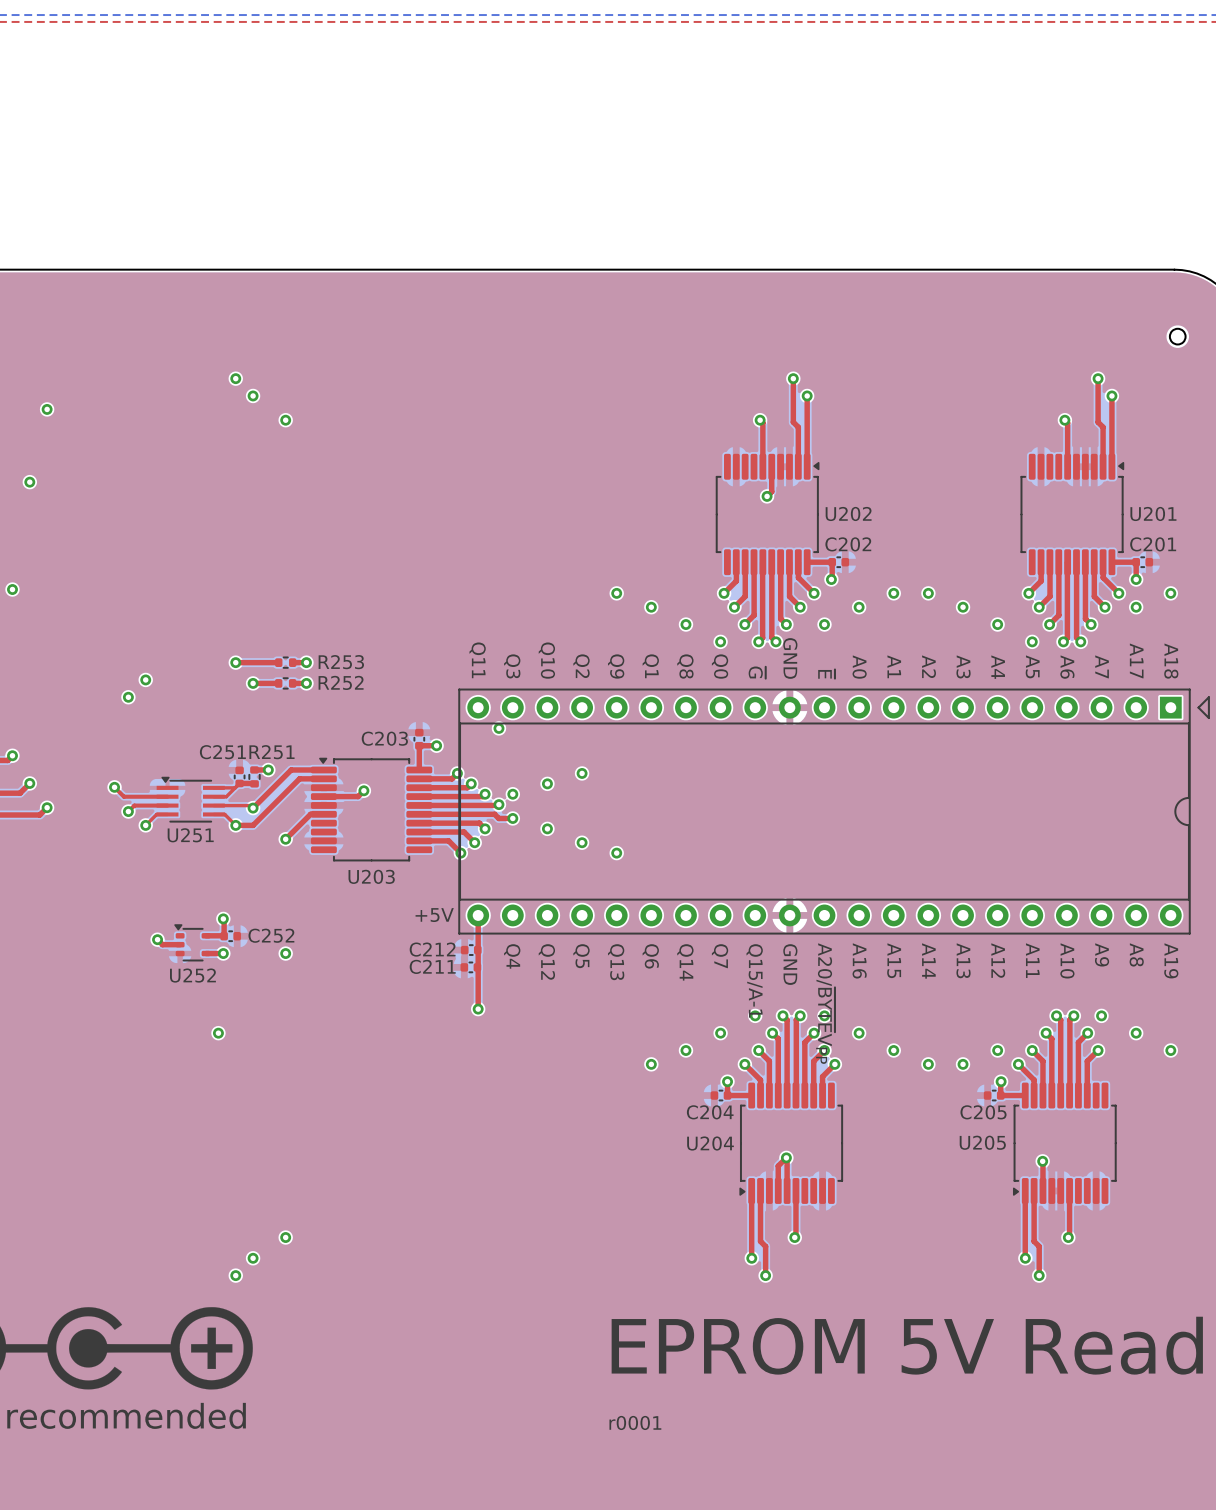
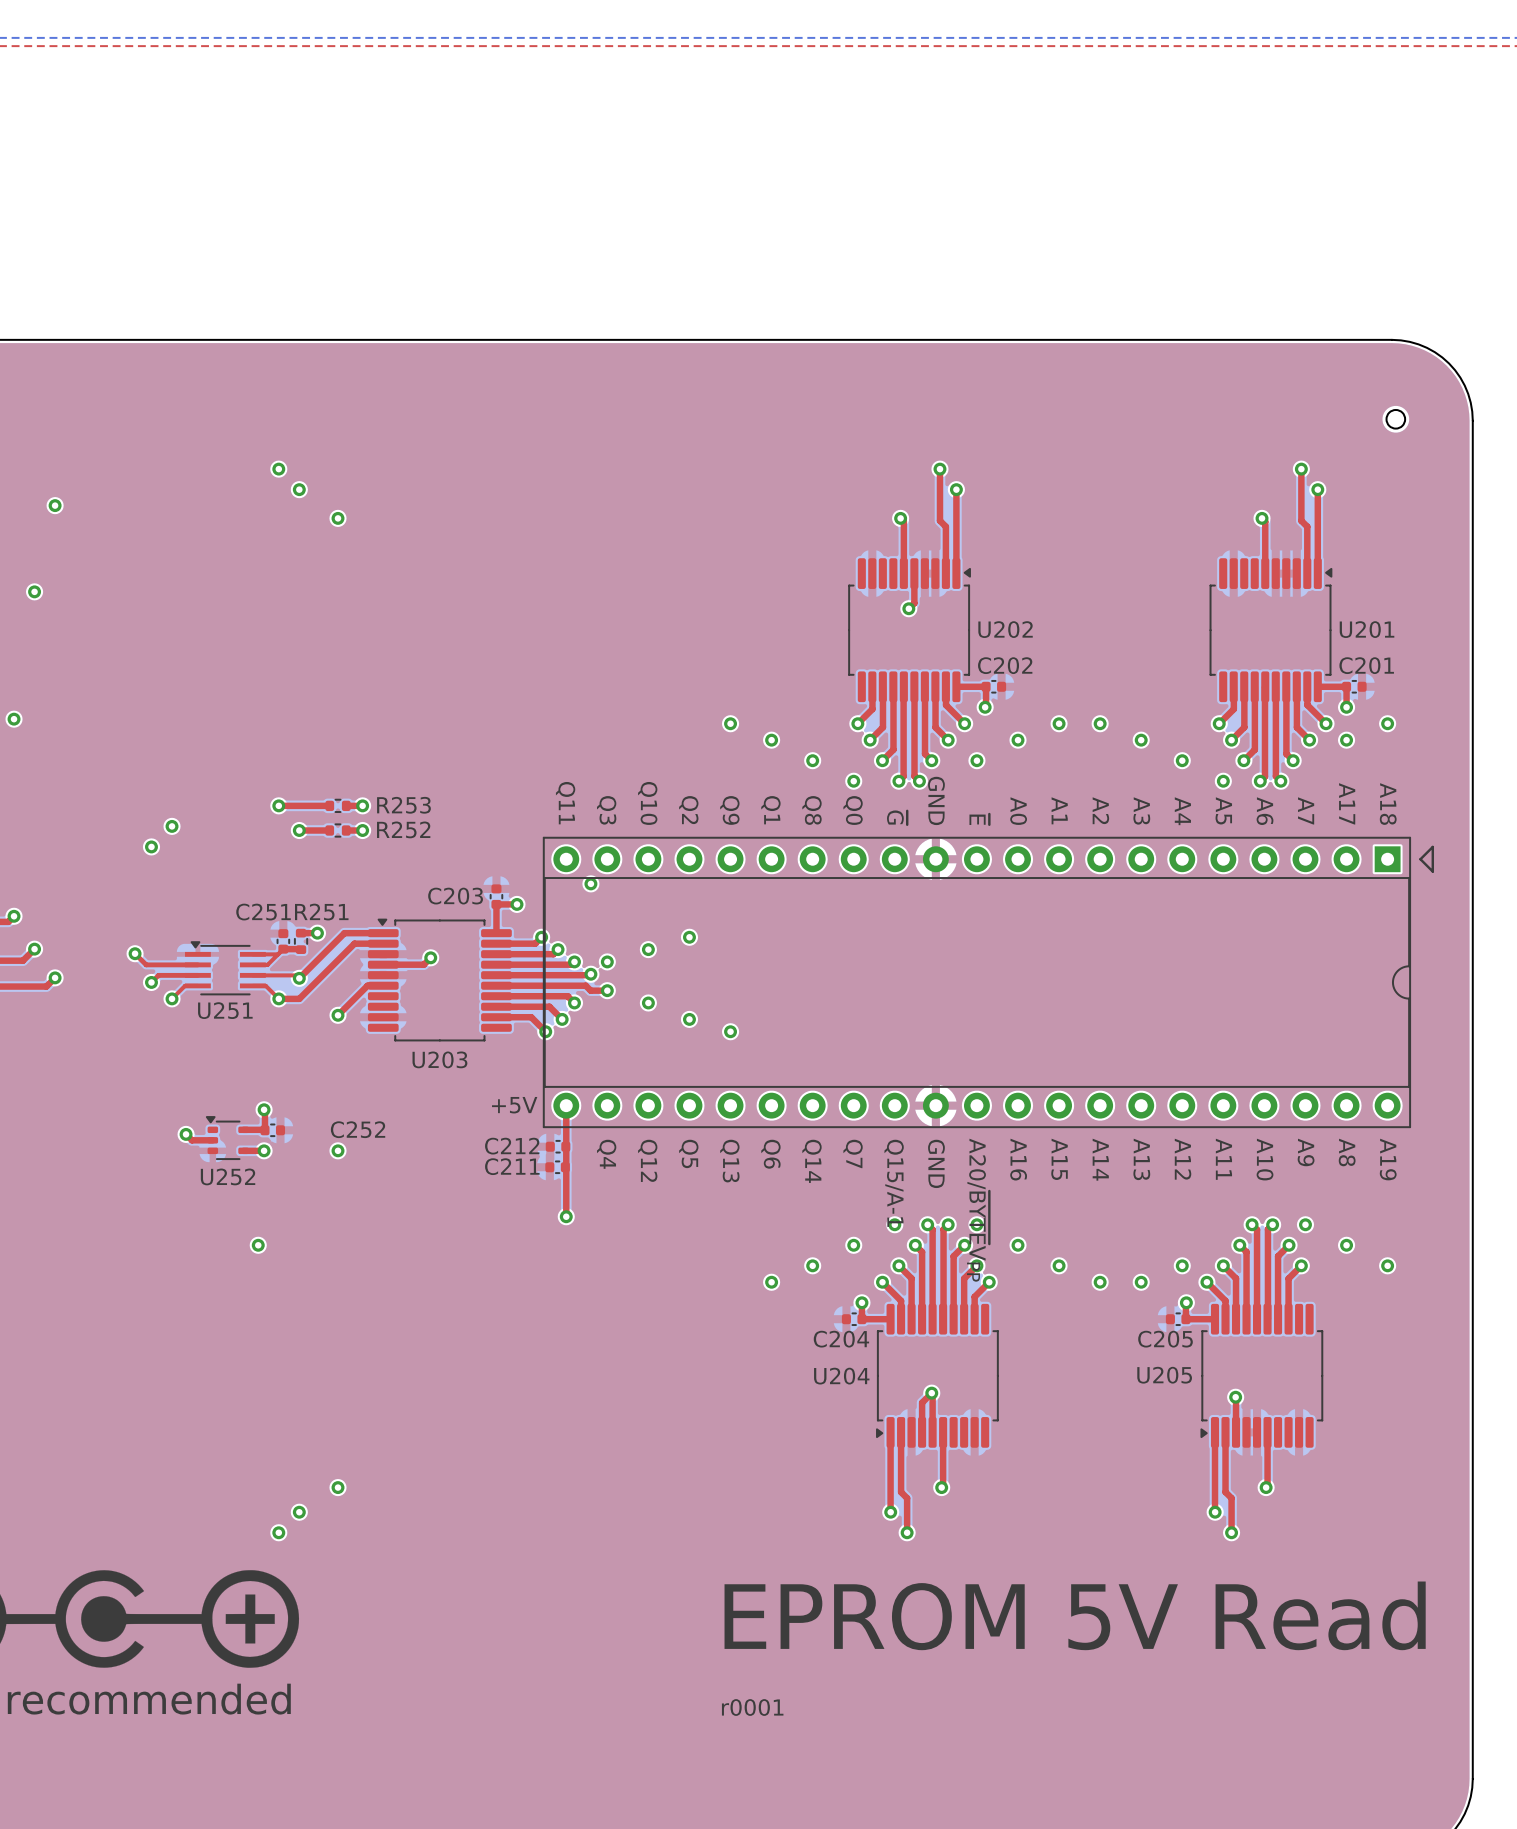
C252 name position: C252 (271, 935) -> C252 (358, 1129)

